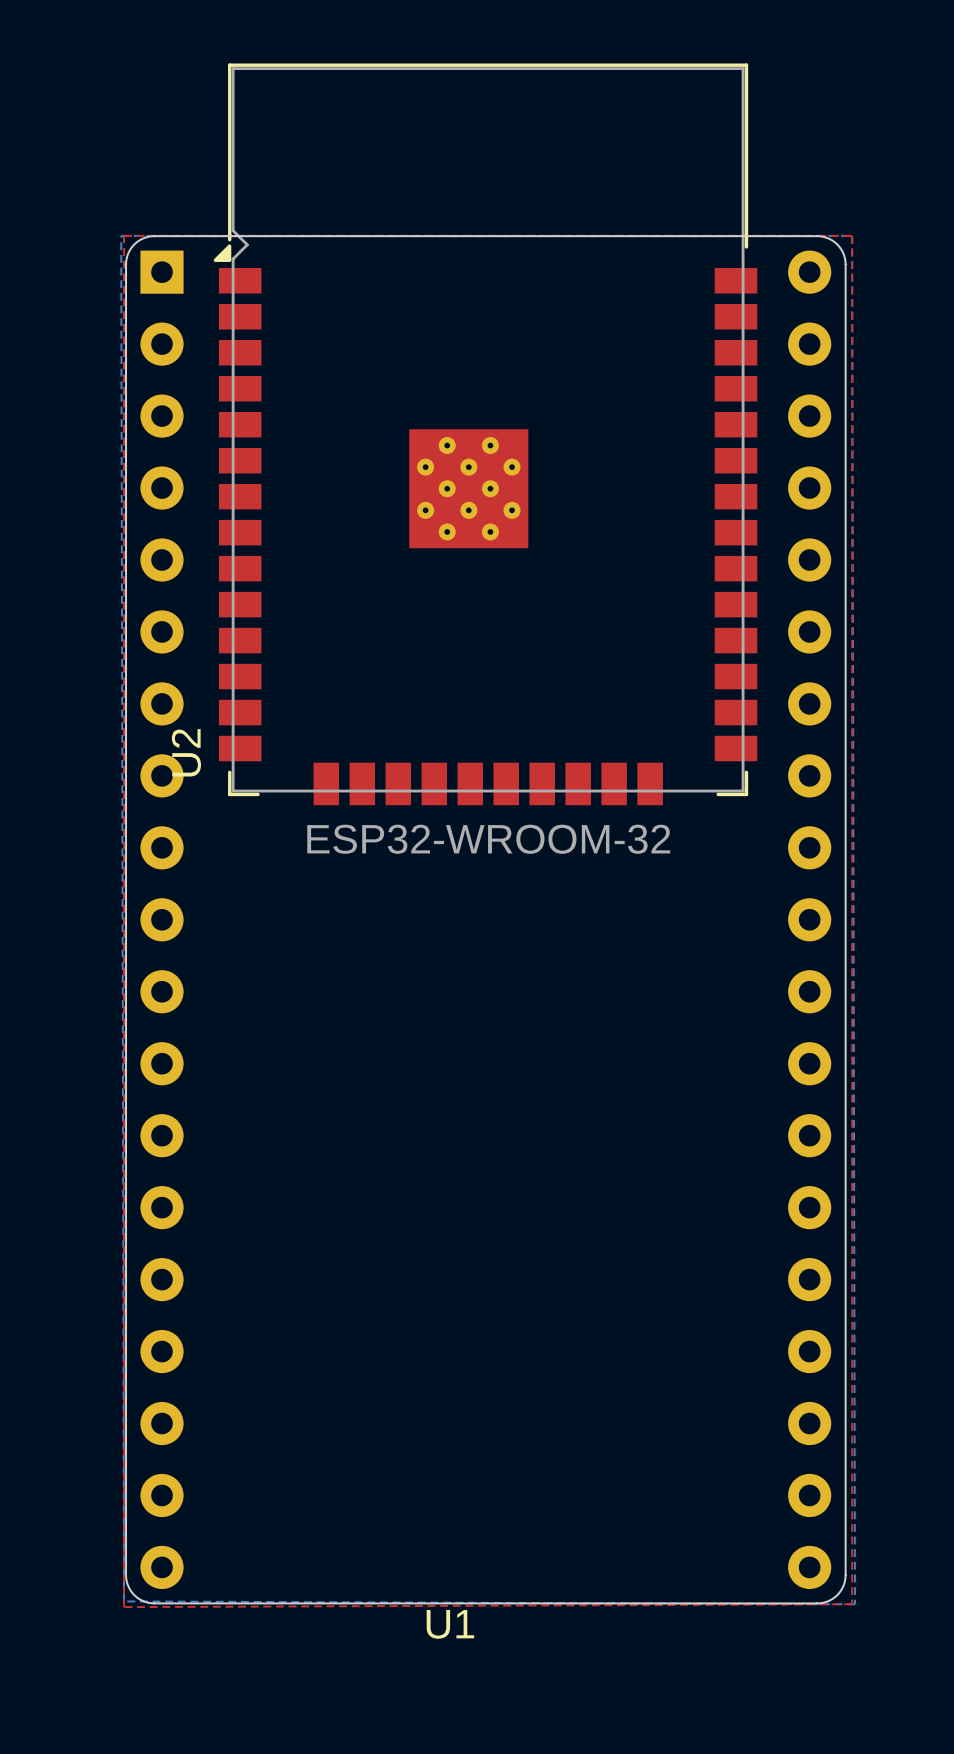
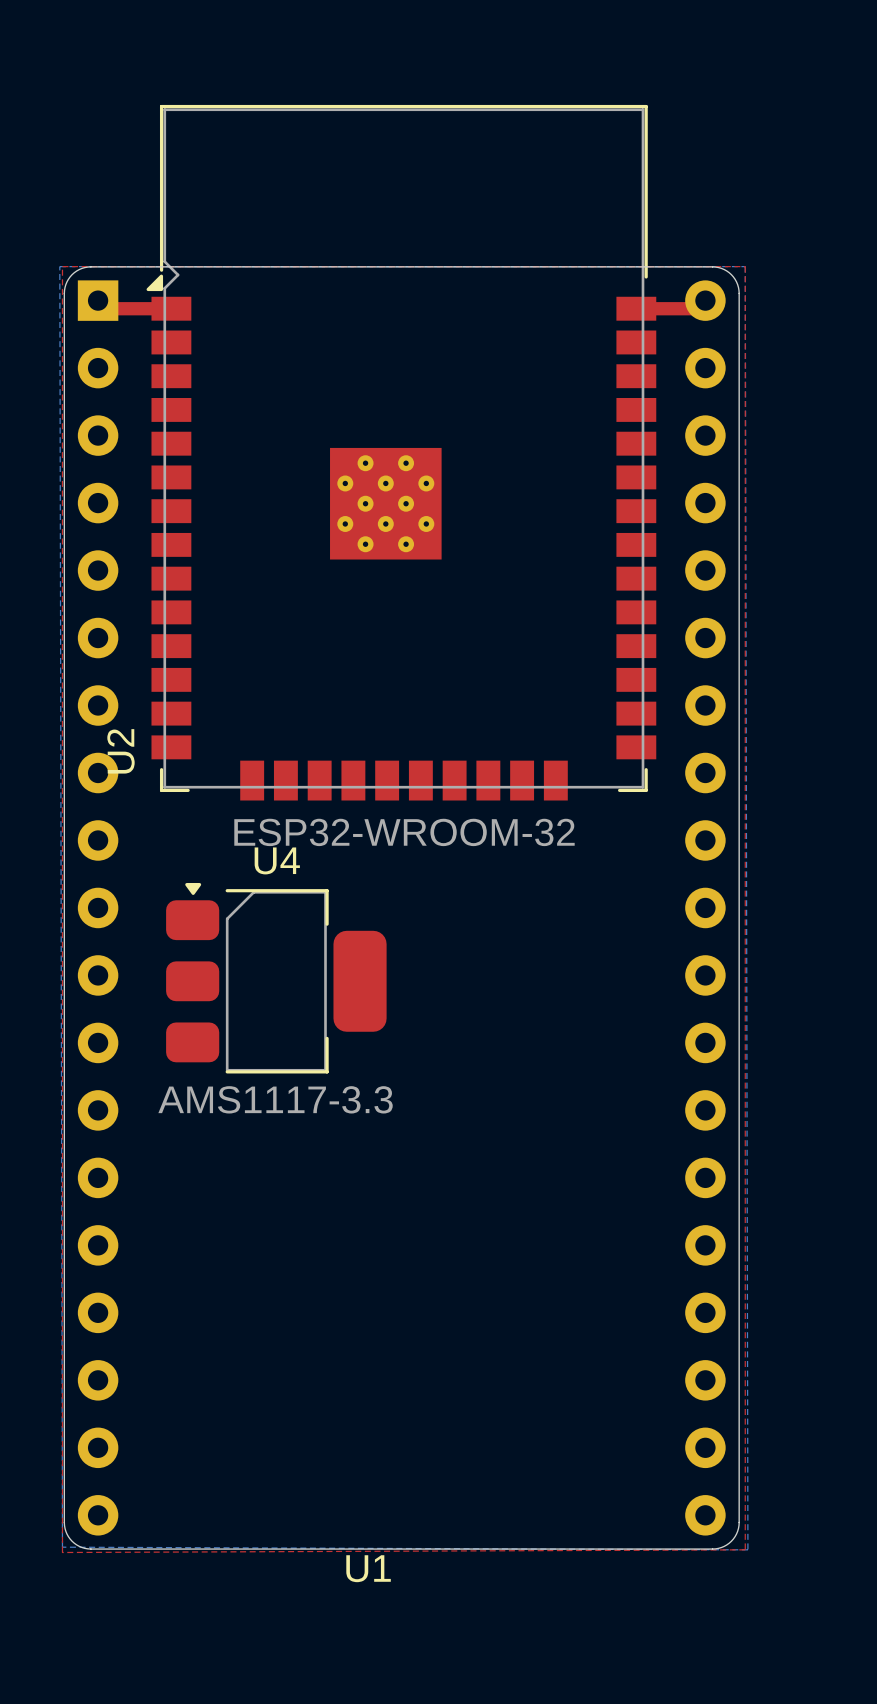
top track: none -> (106, 308) (171, 308)
top track: none -> (636, 308) (697, 308)
U4: none -> AMS1117-3.3 (276, 978)

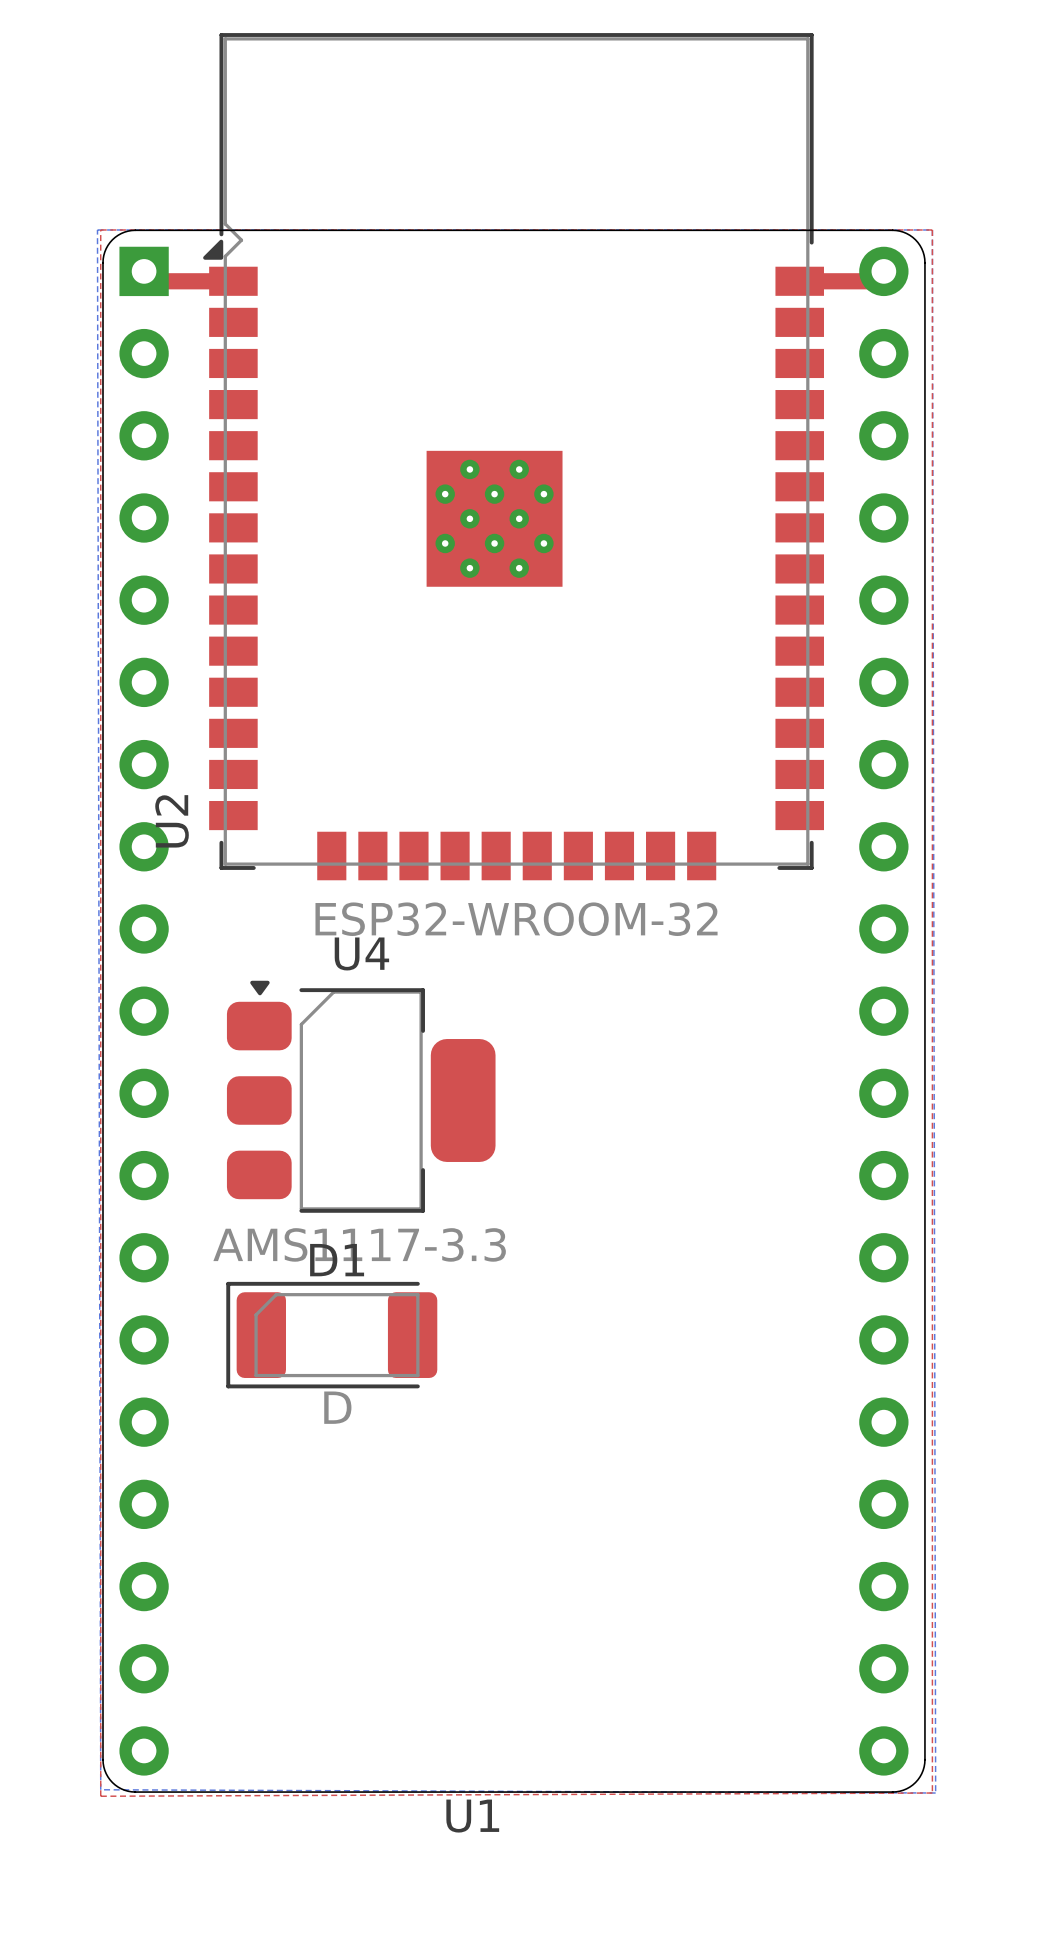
D1: none -> D (331, 1335)

